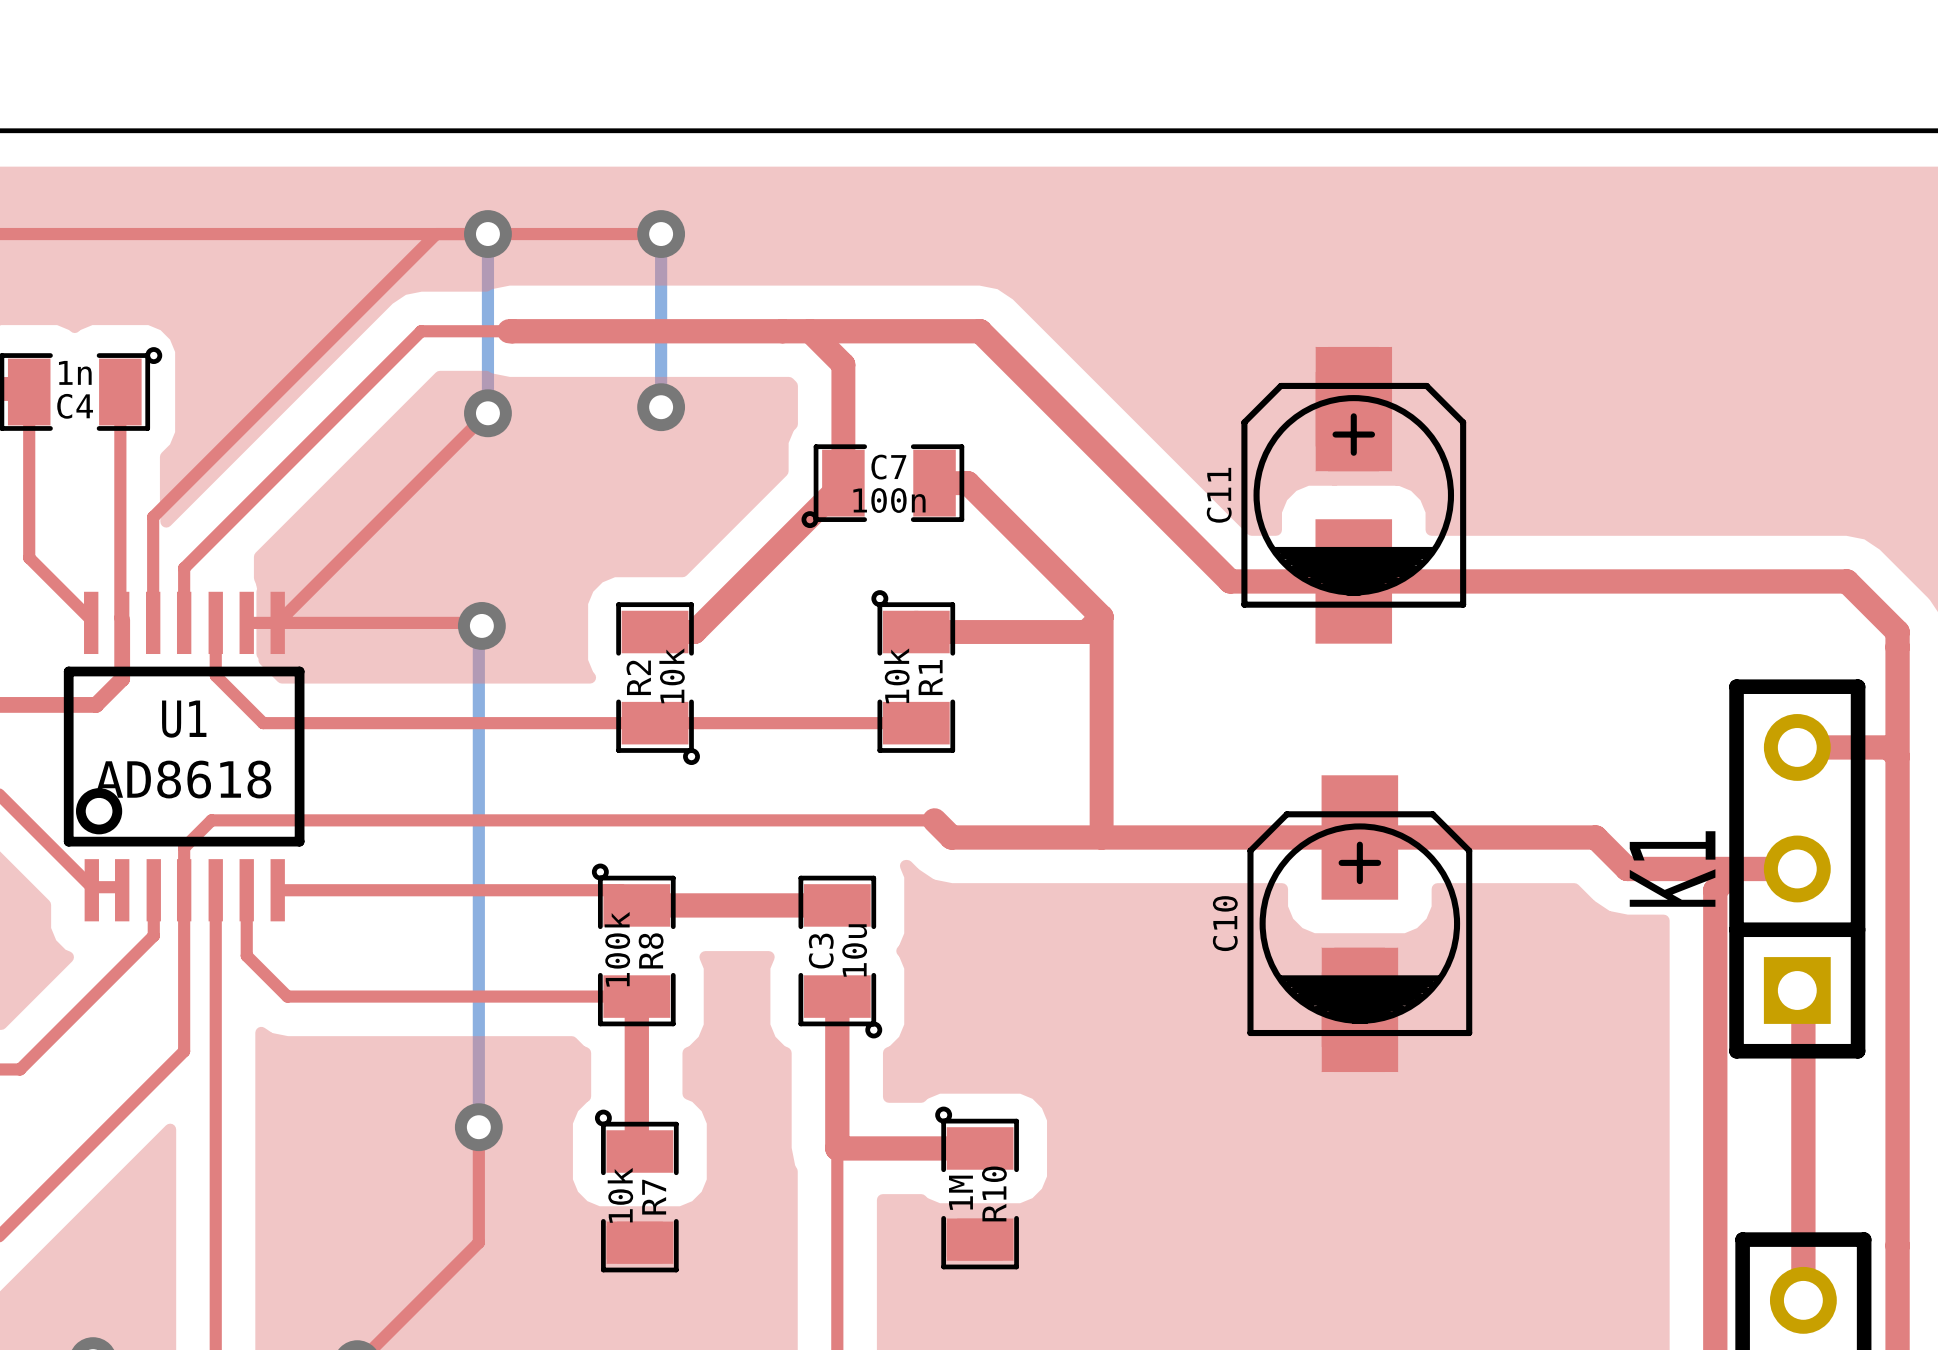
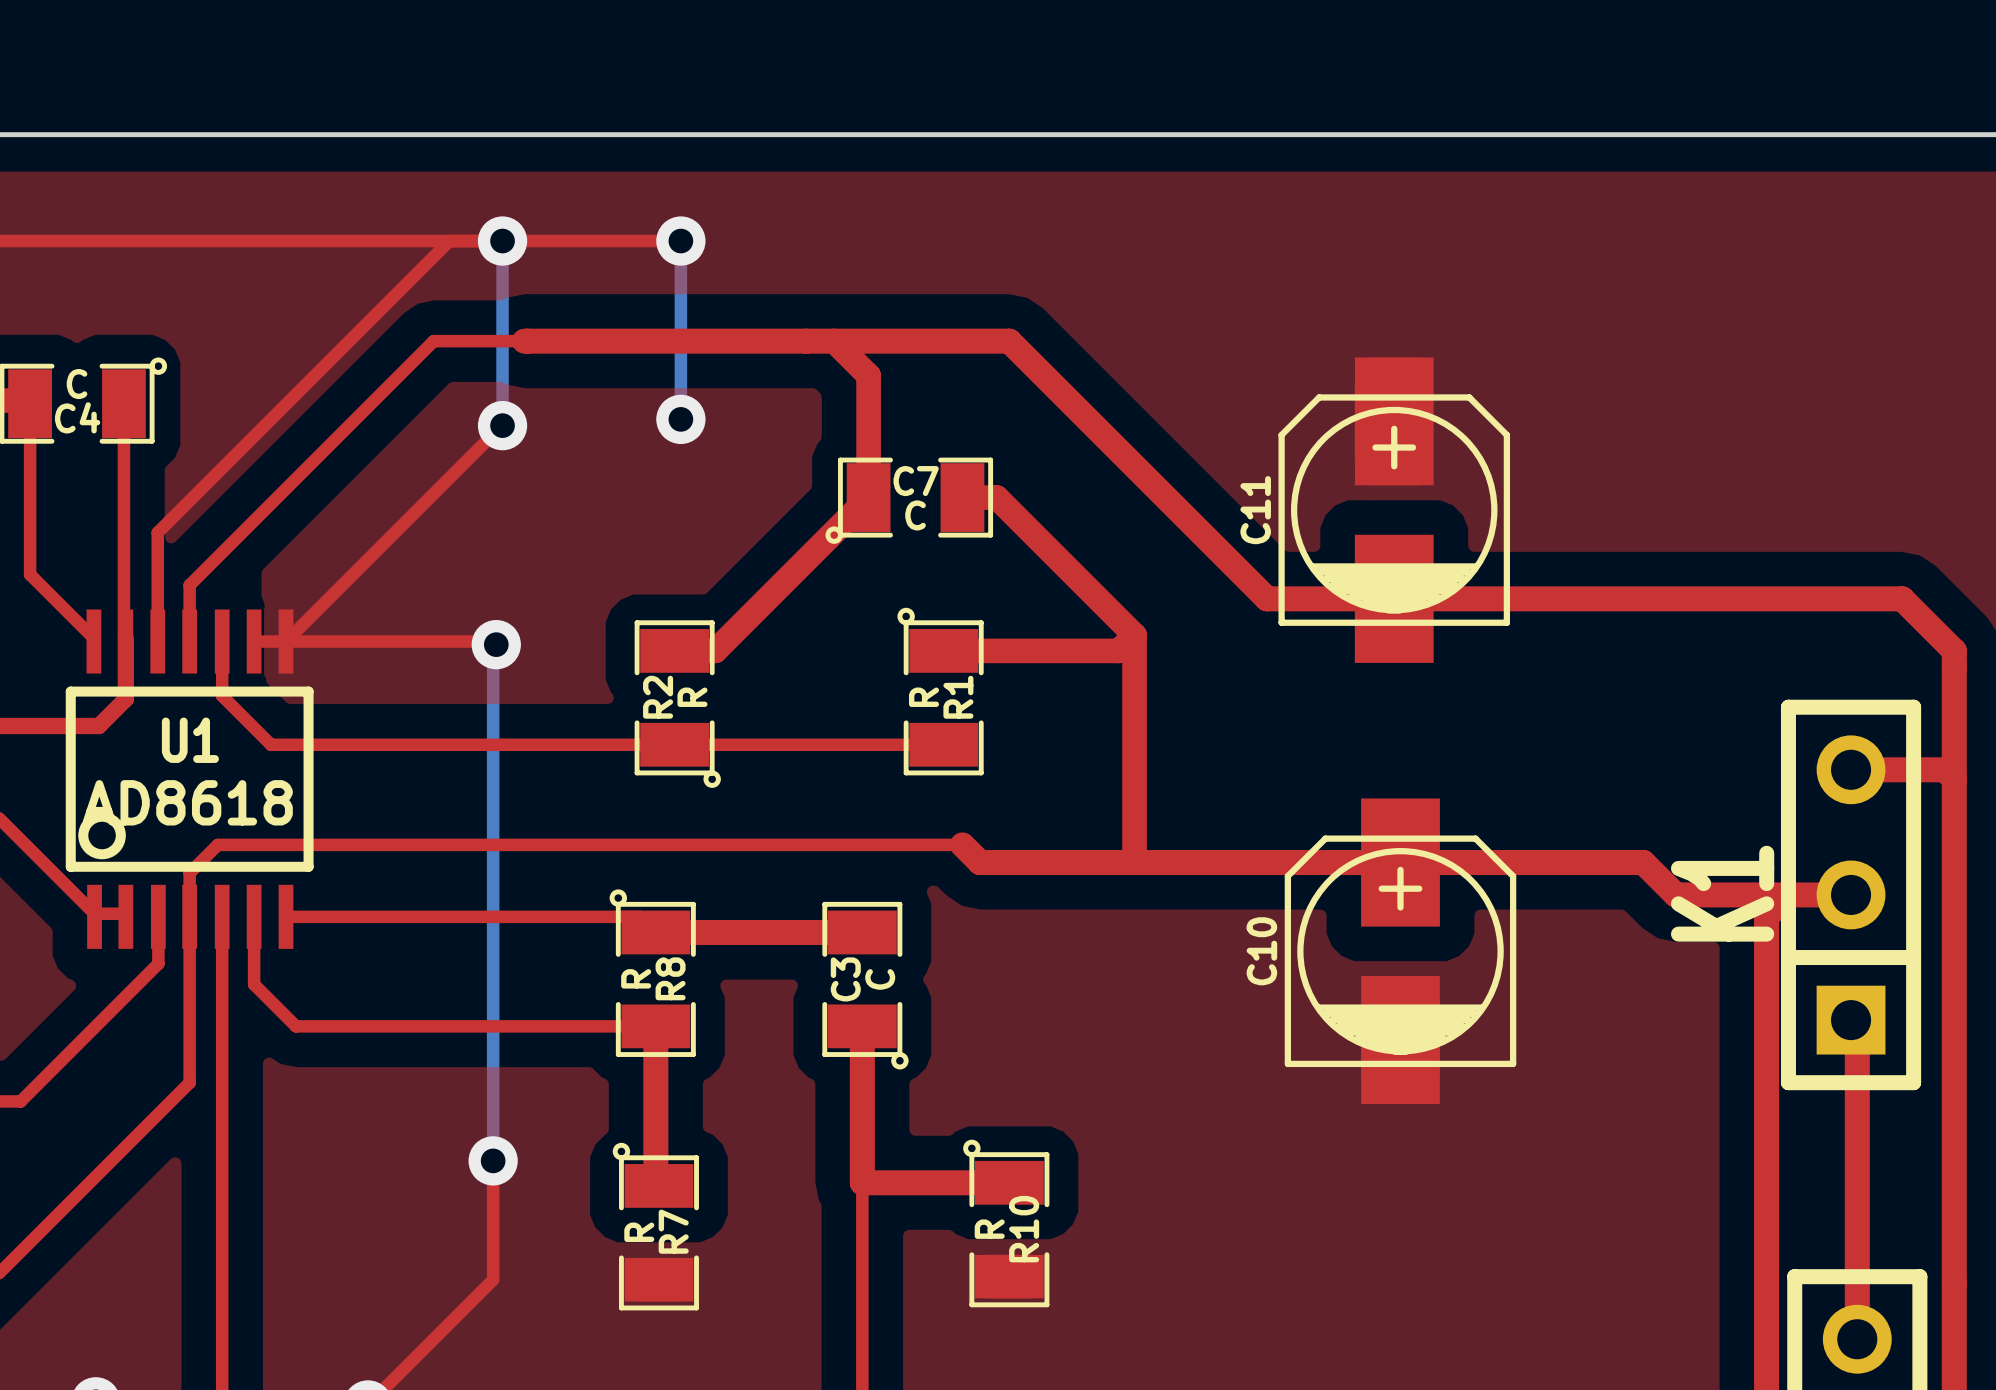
C4 value: 1n (75, 372) -> C (77, 384)
C7 value: 100n (889, 500) -> C (915, 515)
R2 value: 10k (672, 675) -> R (692, 697)
R1 value: 10k (896, 675) -> R (924, 697)
R8 value: 100k (617, 949) -> R (636, 978)
C3 value: 10u (854, 950) -> C (880, 979)
R10 value: 1M (960, 1192) -> R (989, 1229)
R7 value: 10k (620, 1195) -> R (639, 1232)

